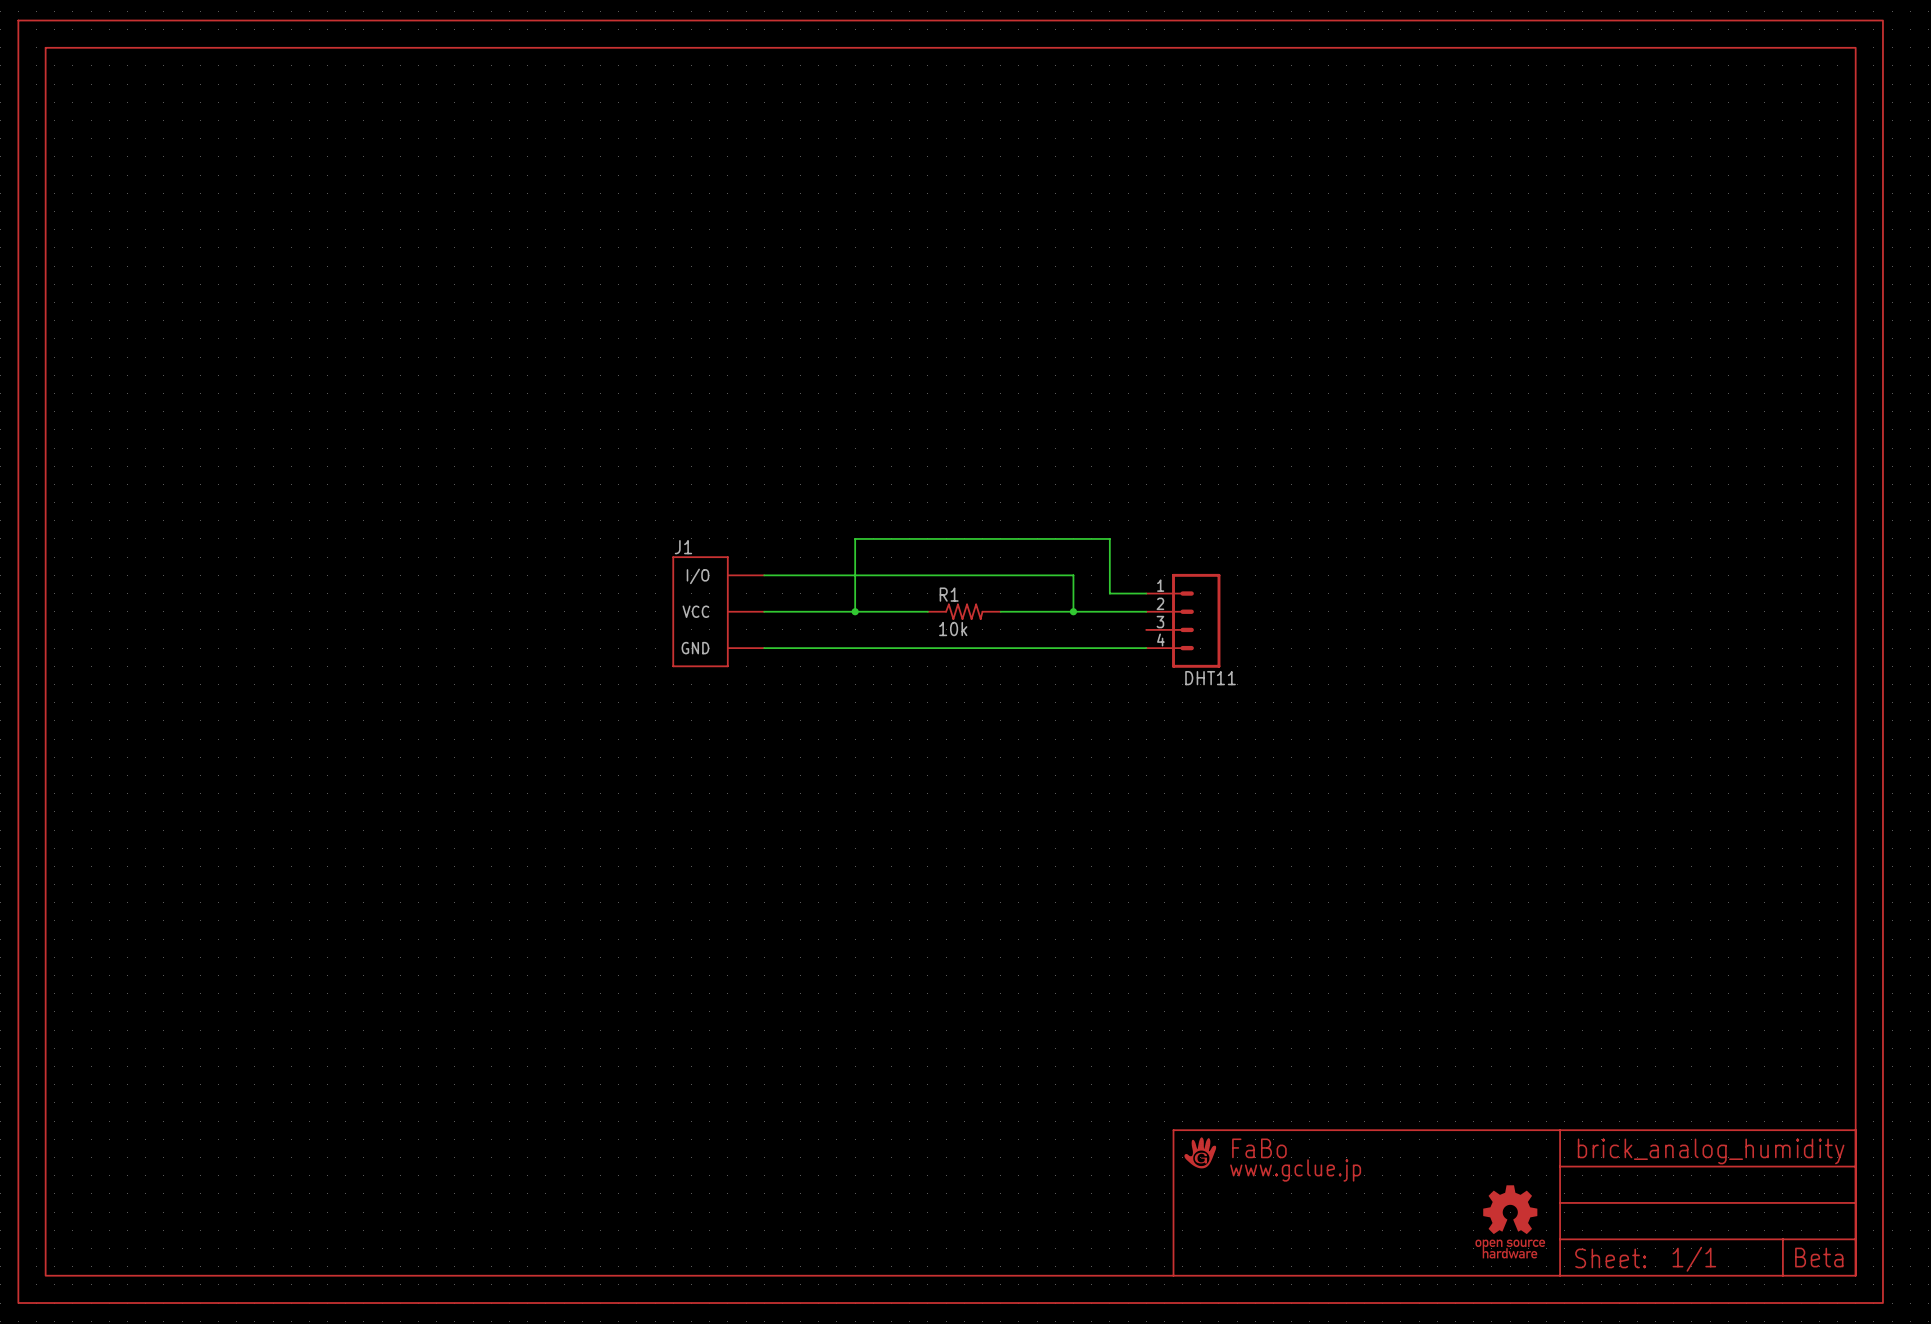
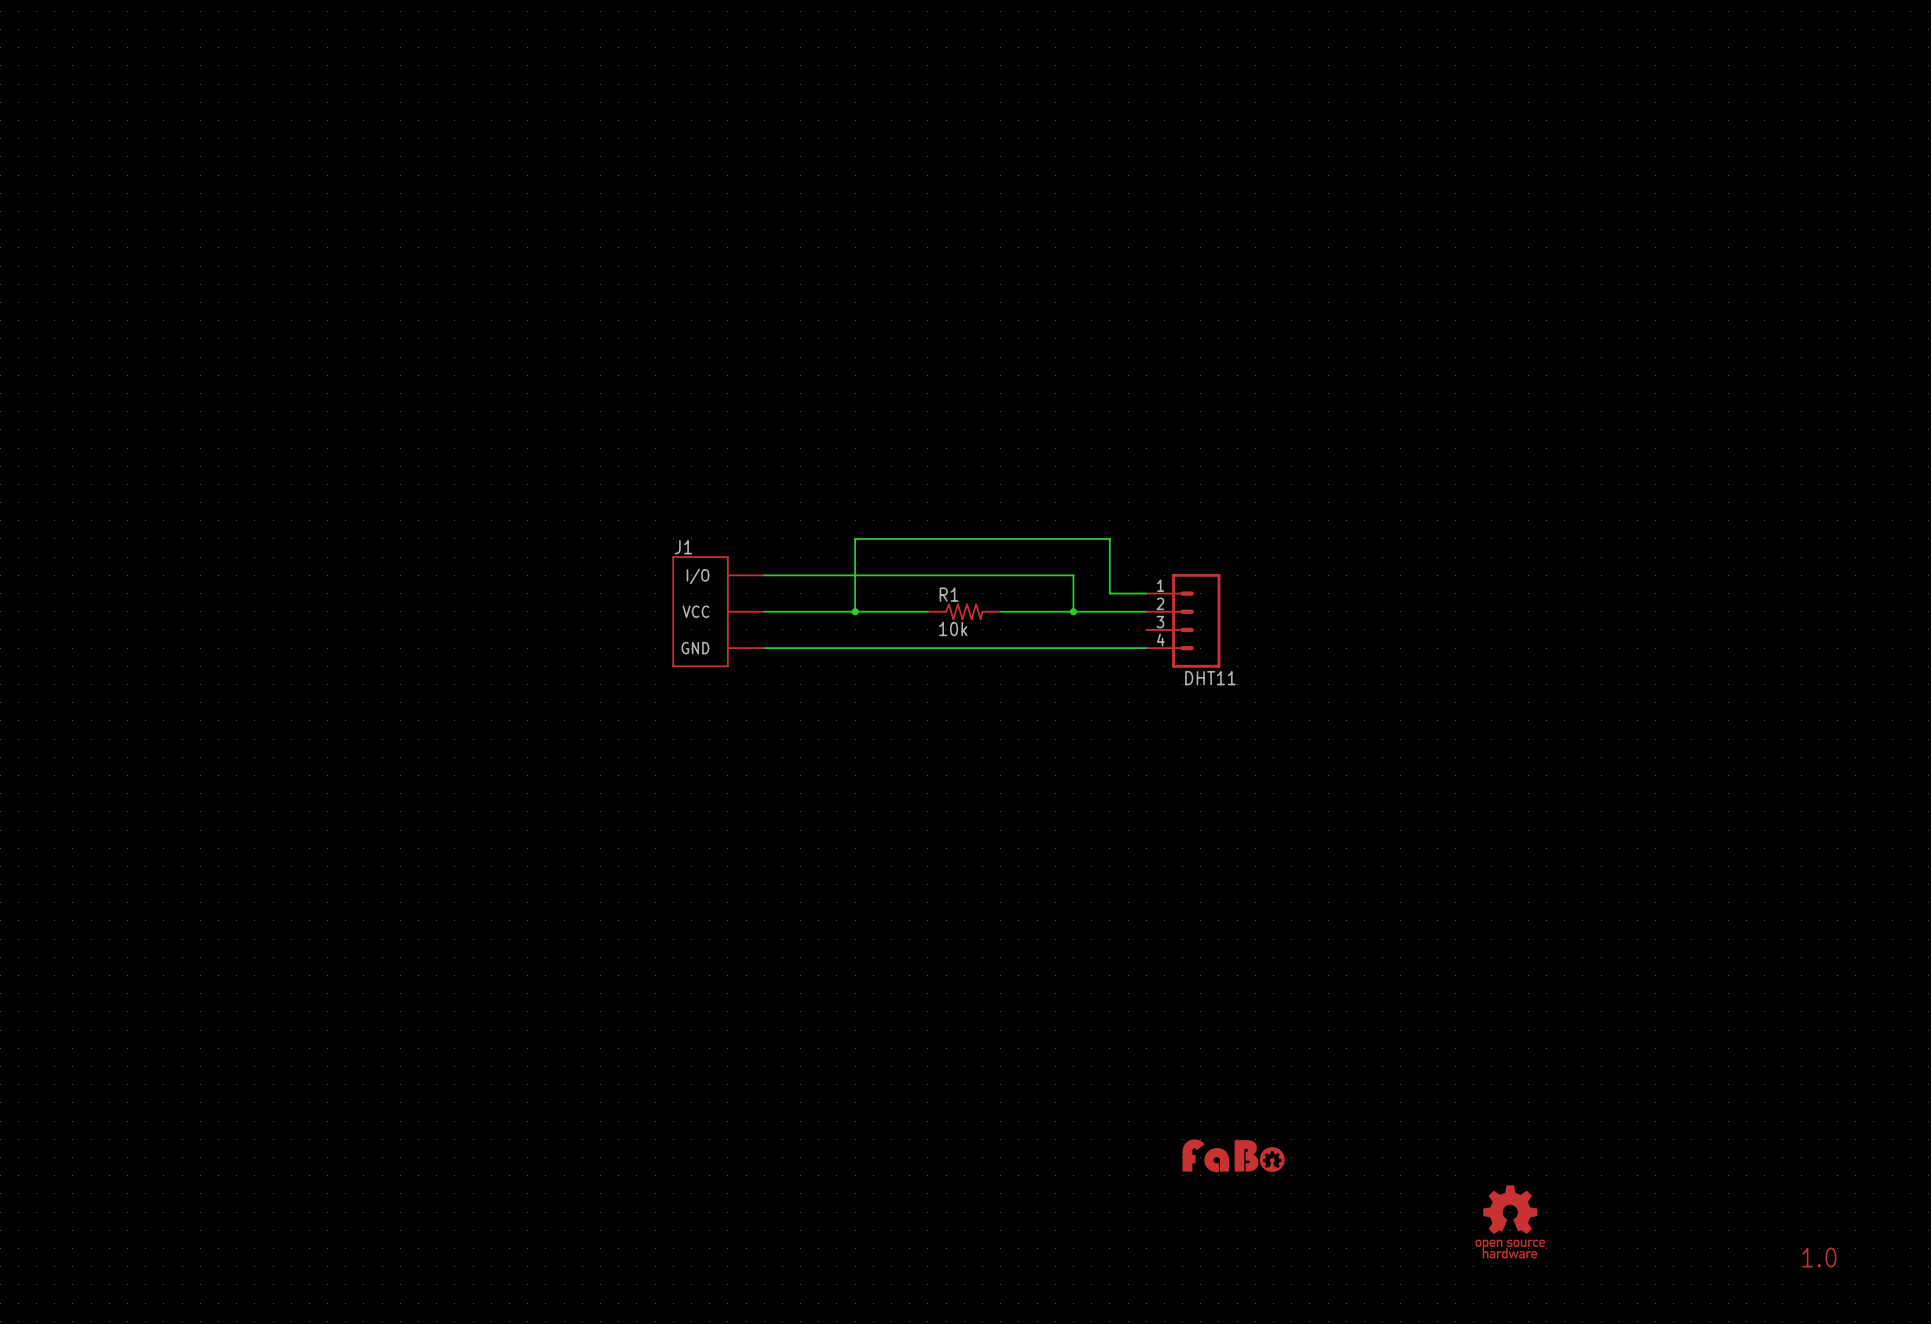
part: (950, 661) -> none
part: none -> (1233, 1155)
text: Beta (1819, 1257) -> 1.0 (1819, 1257)

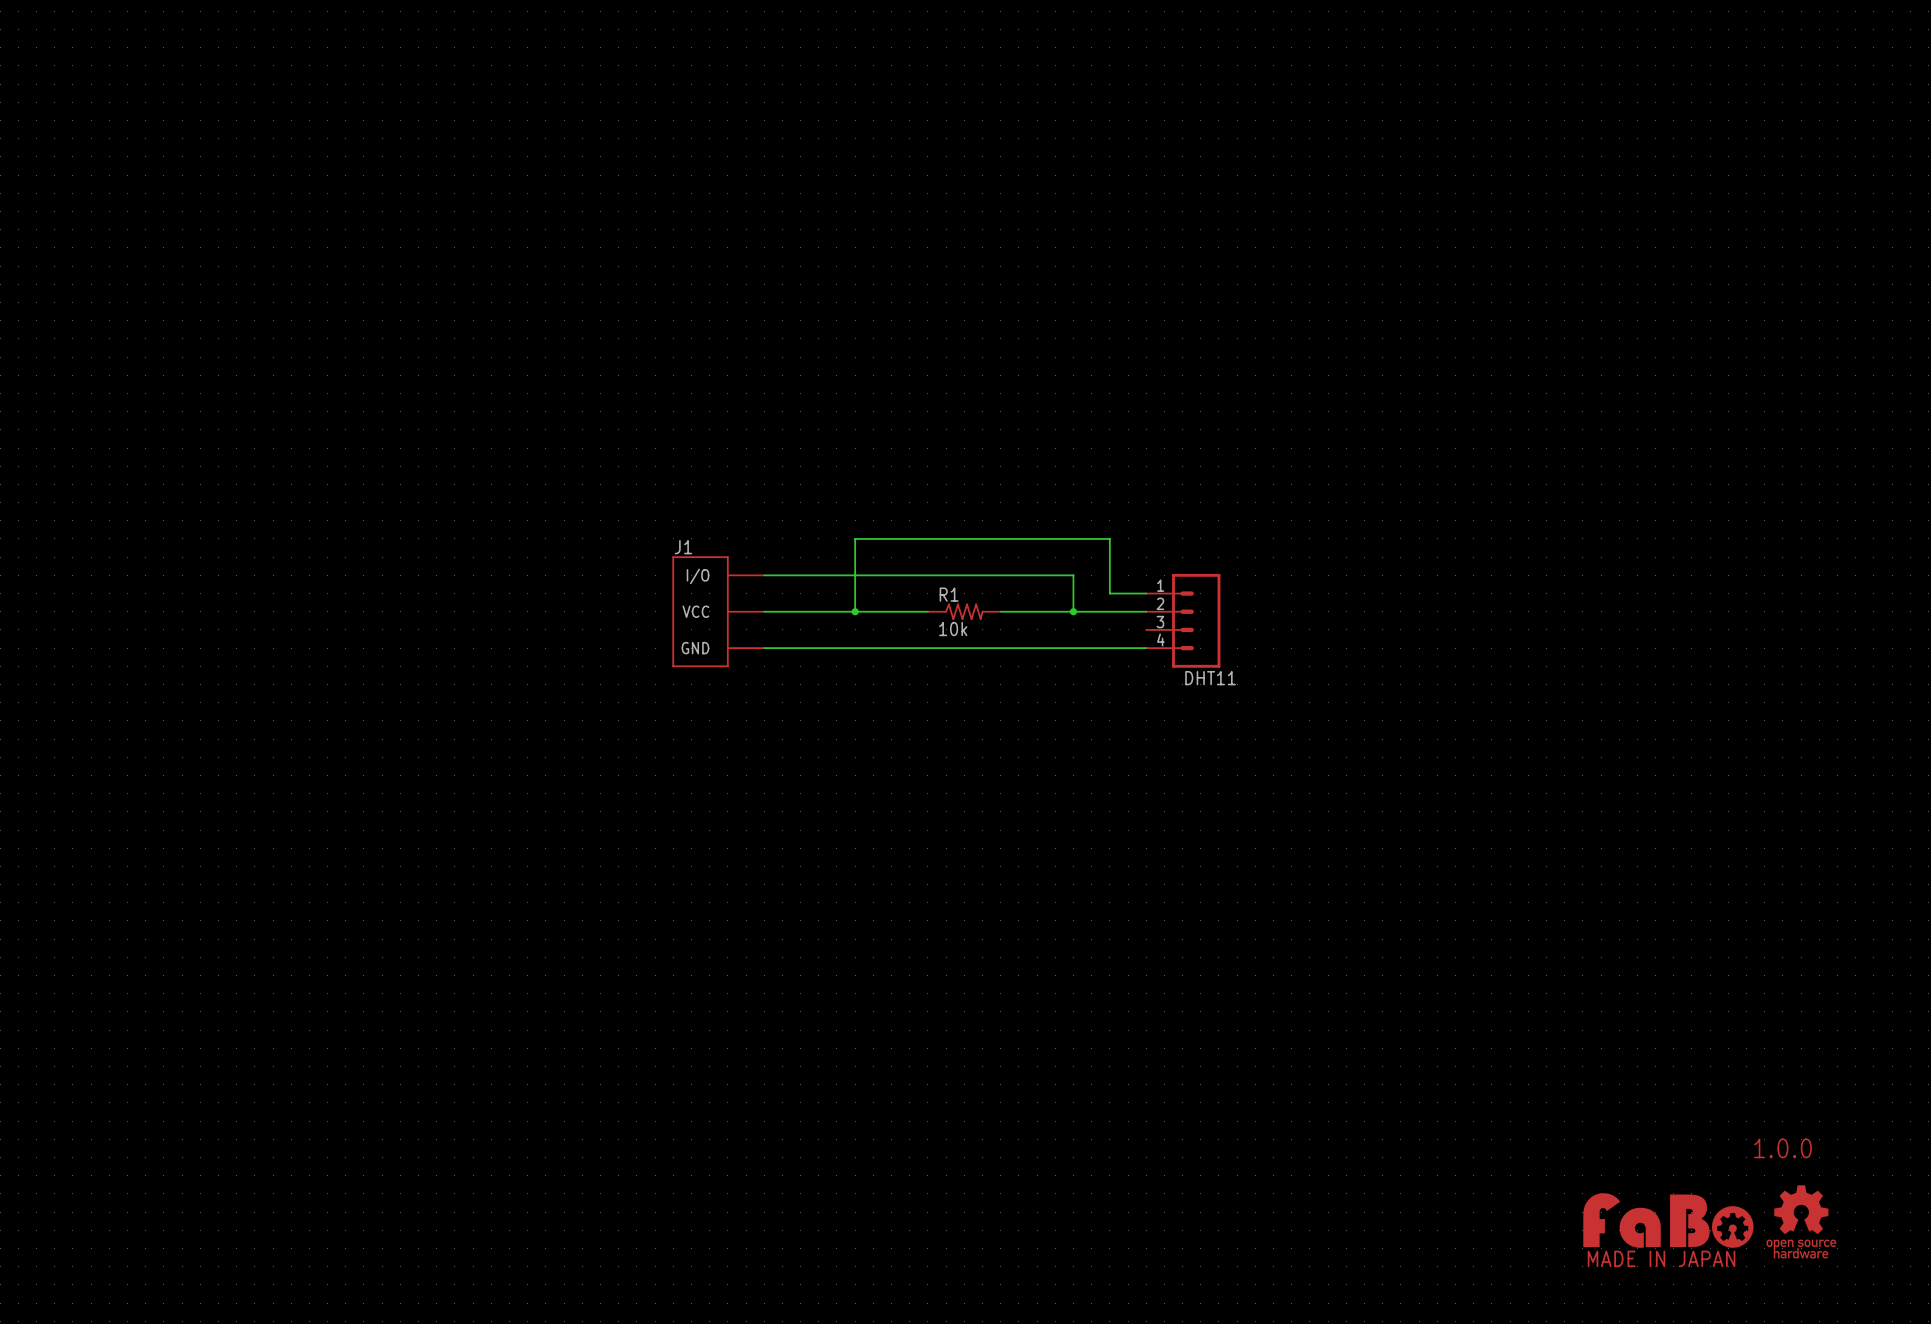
text: none -> 1.0.0 (1782, 1148)
part: (1233, 1155) -> none
part: none -> (1668, 1220)
part: (1510, 1221) -> none
part: none -> (1801, 1221)
text: 1.0 (1819, 1257) -> none

